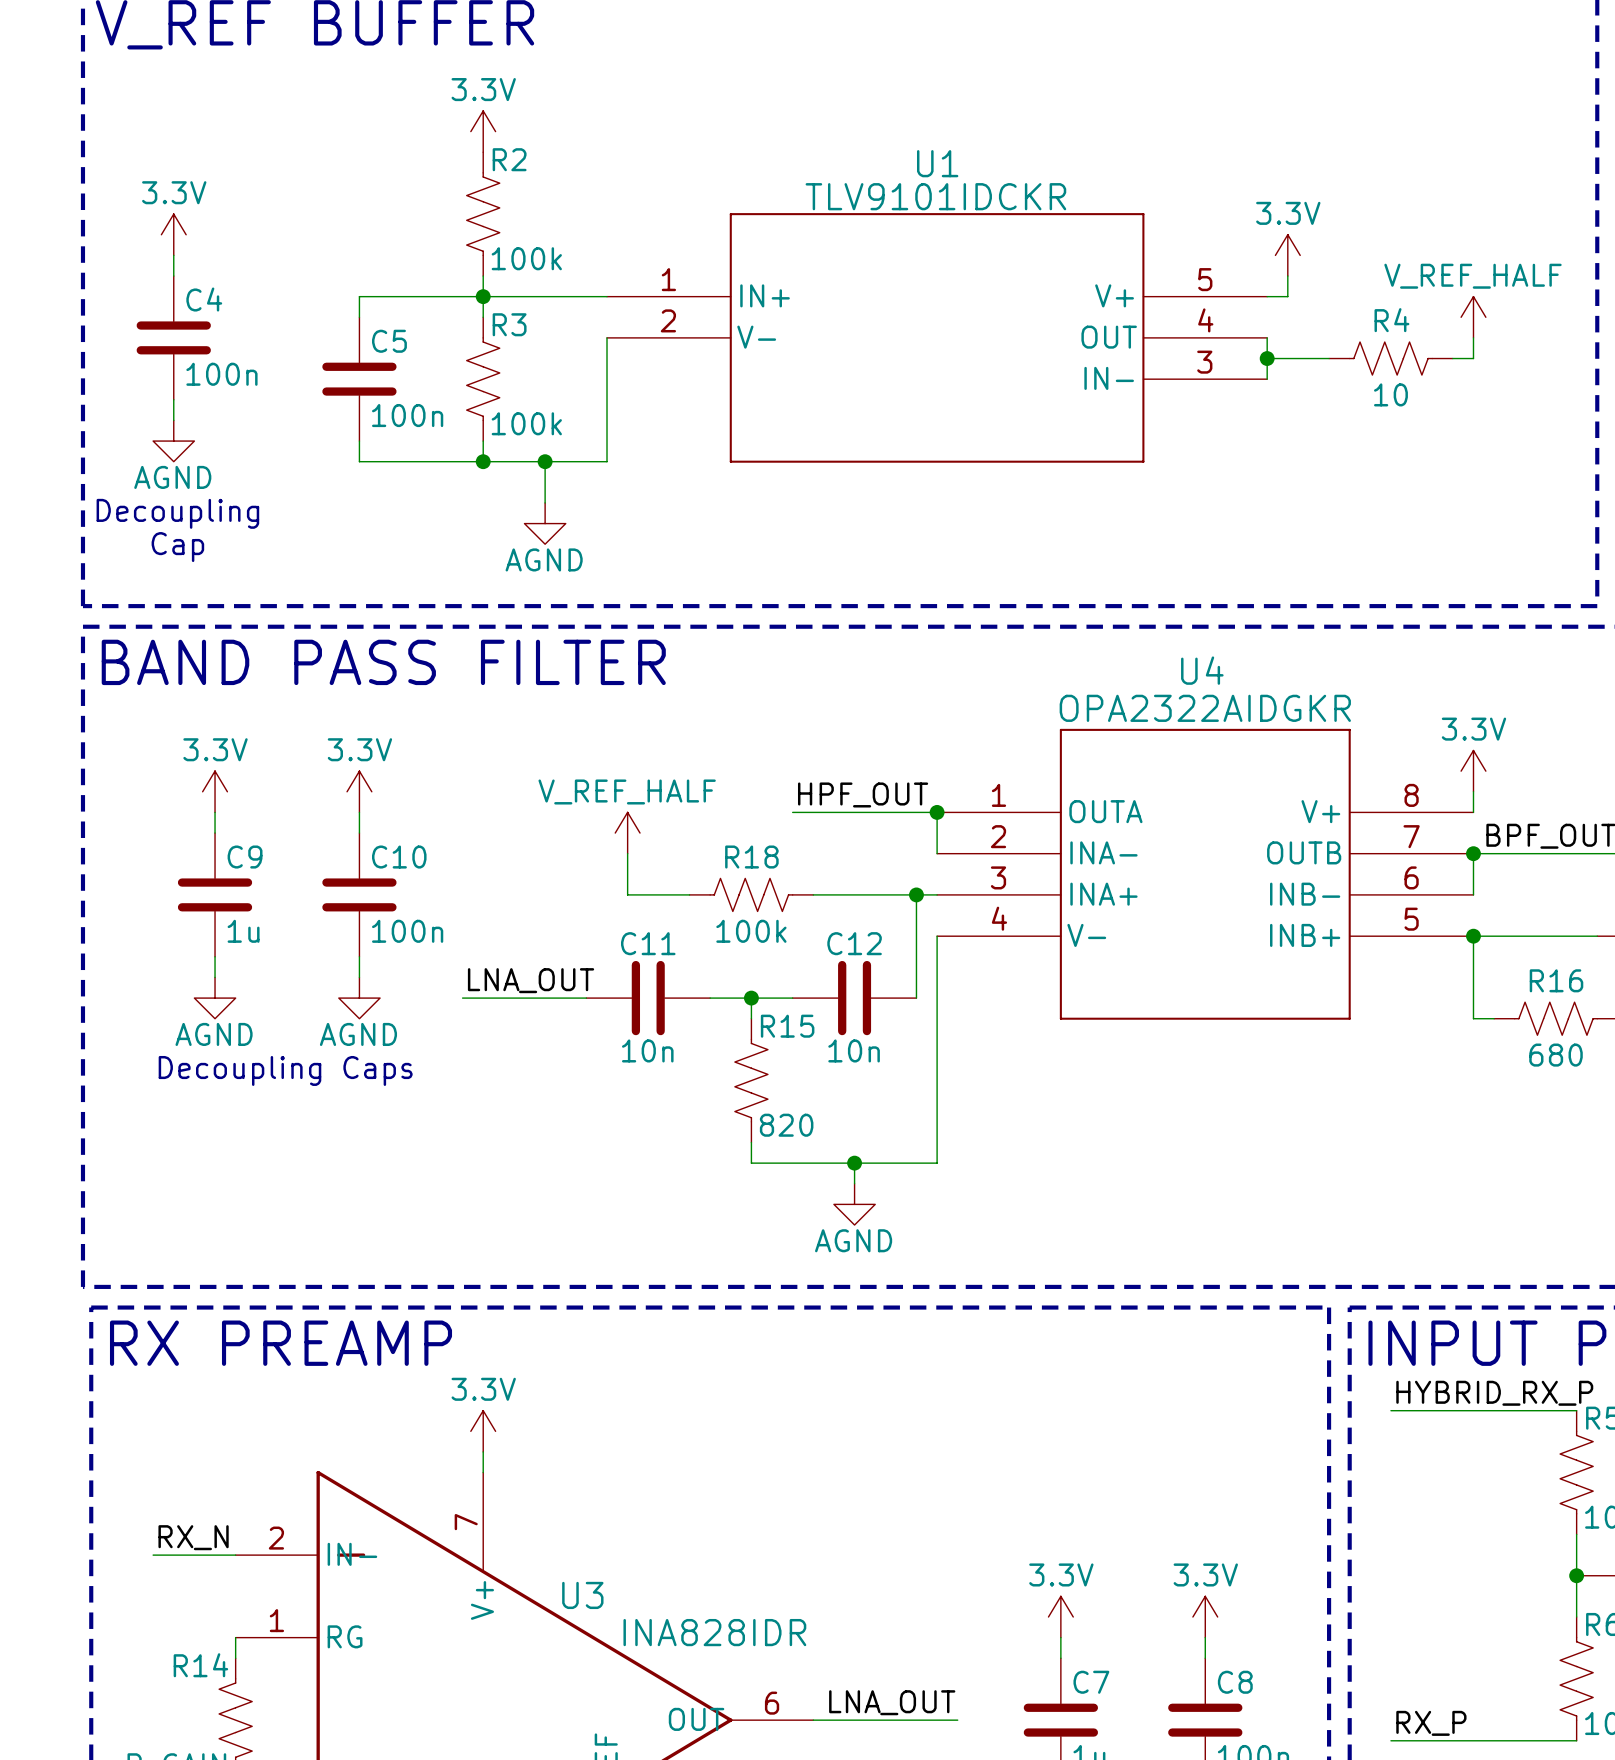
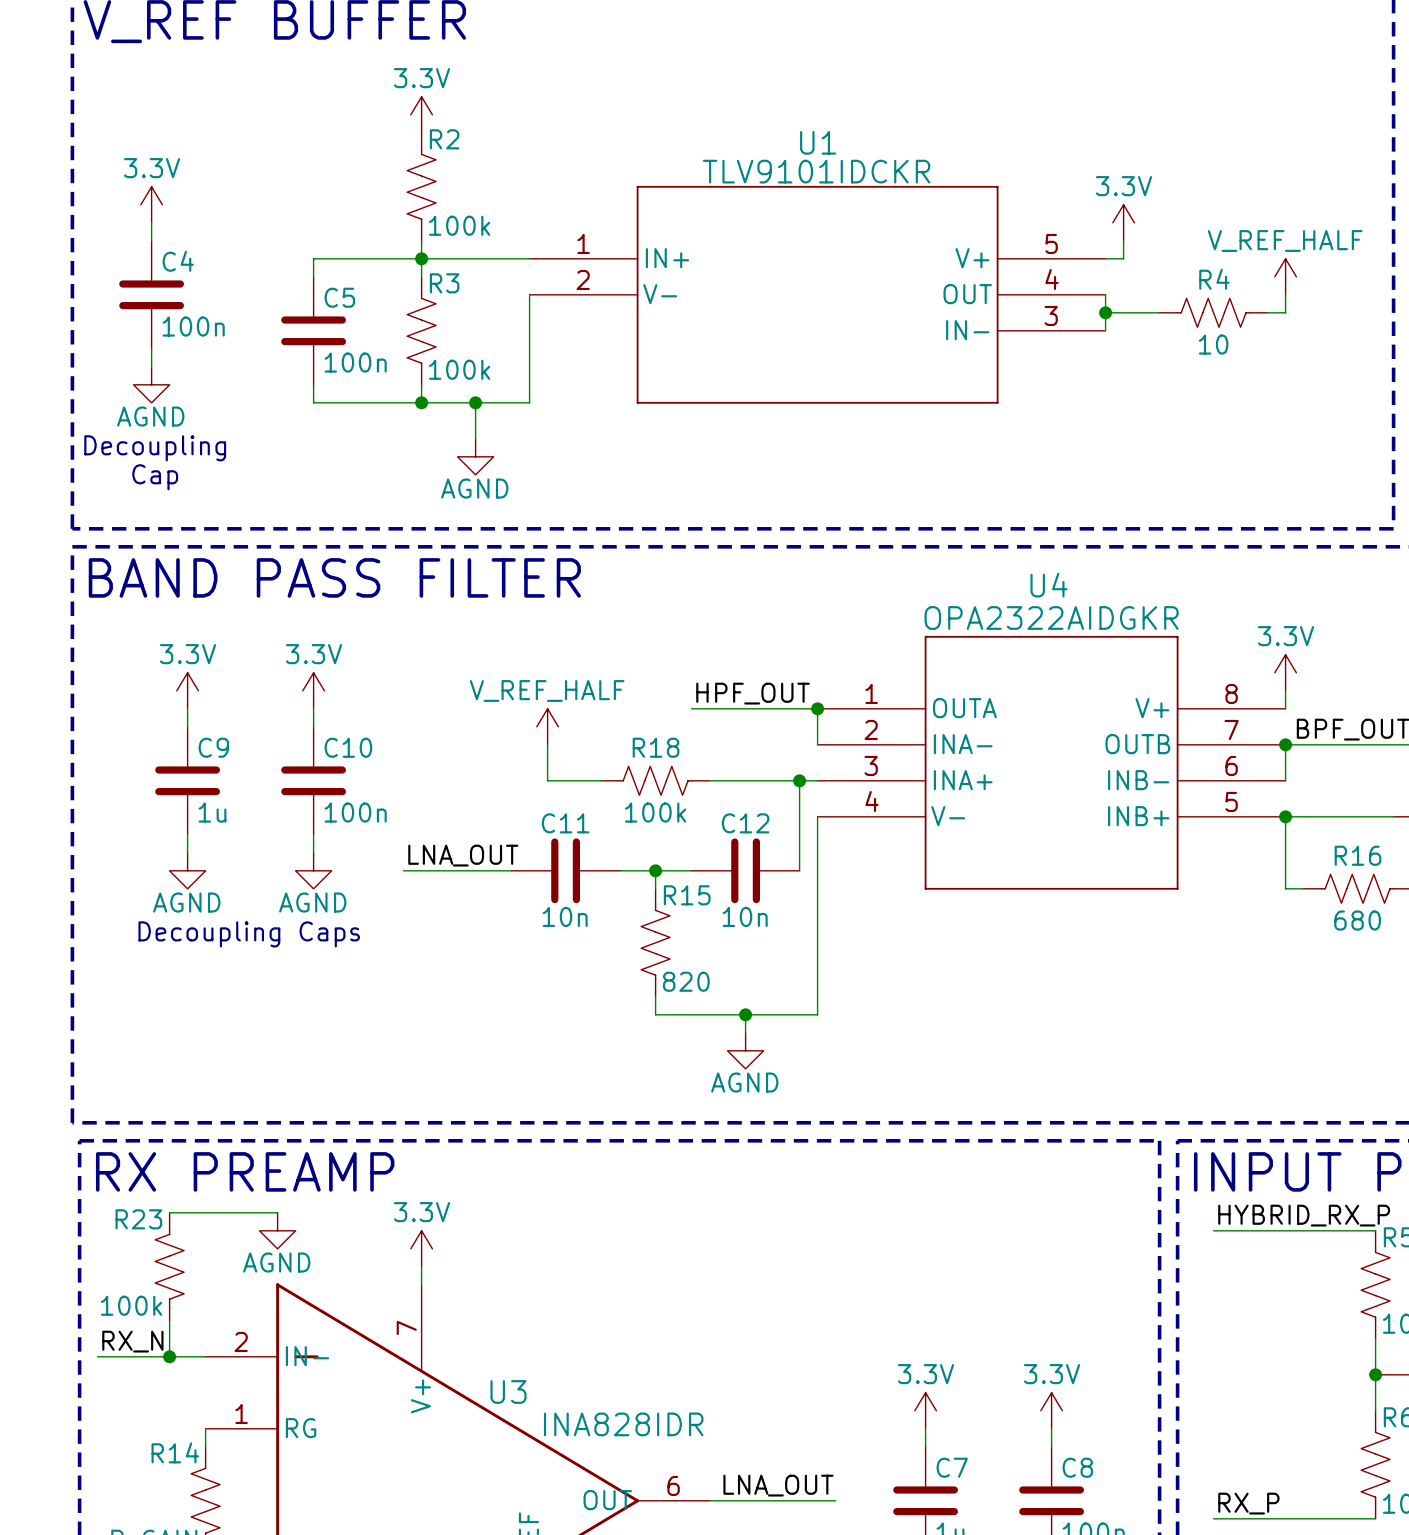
wire: none -> (169, 1212) (277, 1212)
power symbol: none -> AGND (277, 1230)
R23: none -> 100k (169, 1266)
wire: none -> (169, 1320) (169, 1356)
label position: RX_N (193, 1537) -> RX_N (132, 1341)
wire: none -> (97, 1356) (133, 1356)
junction: none -> (169, 1356)

